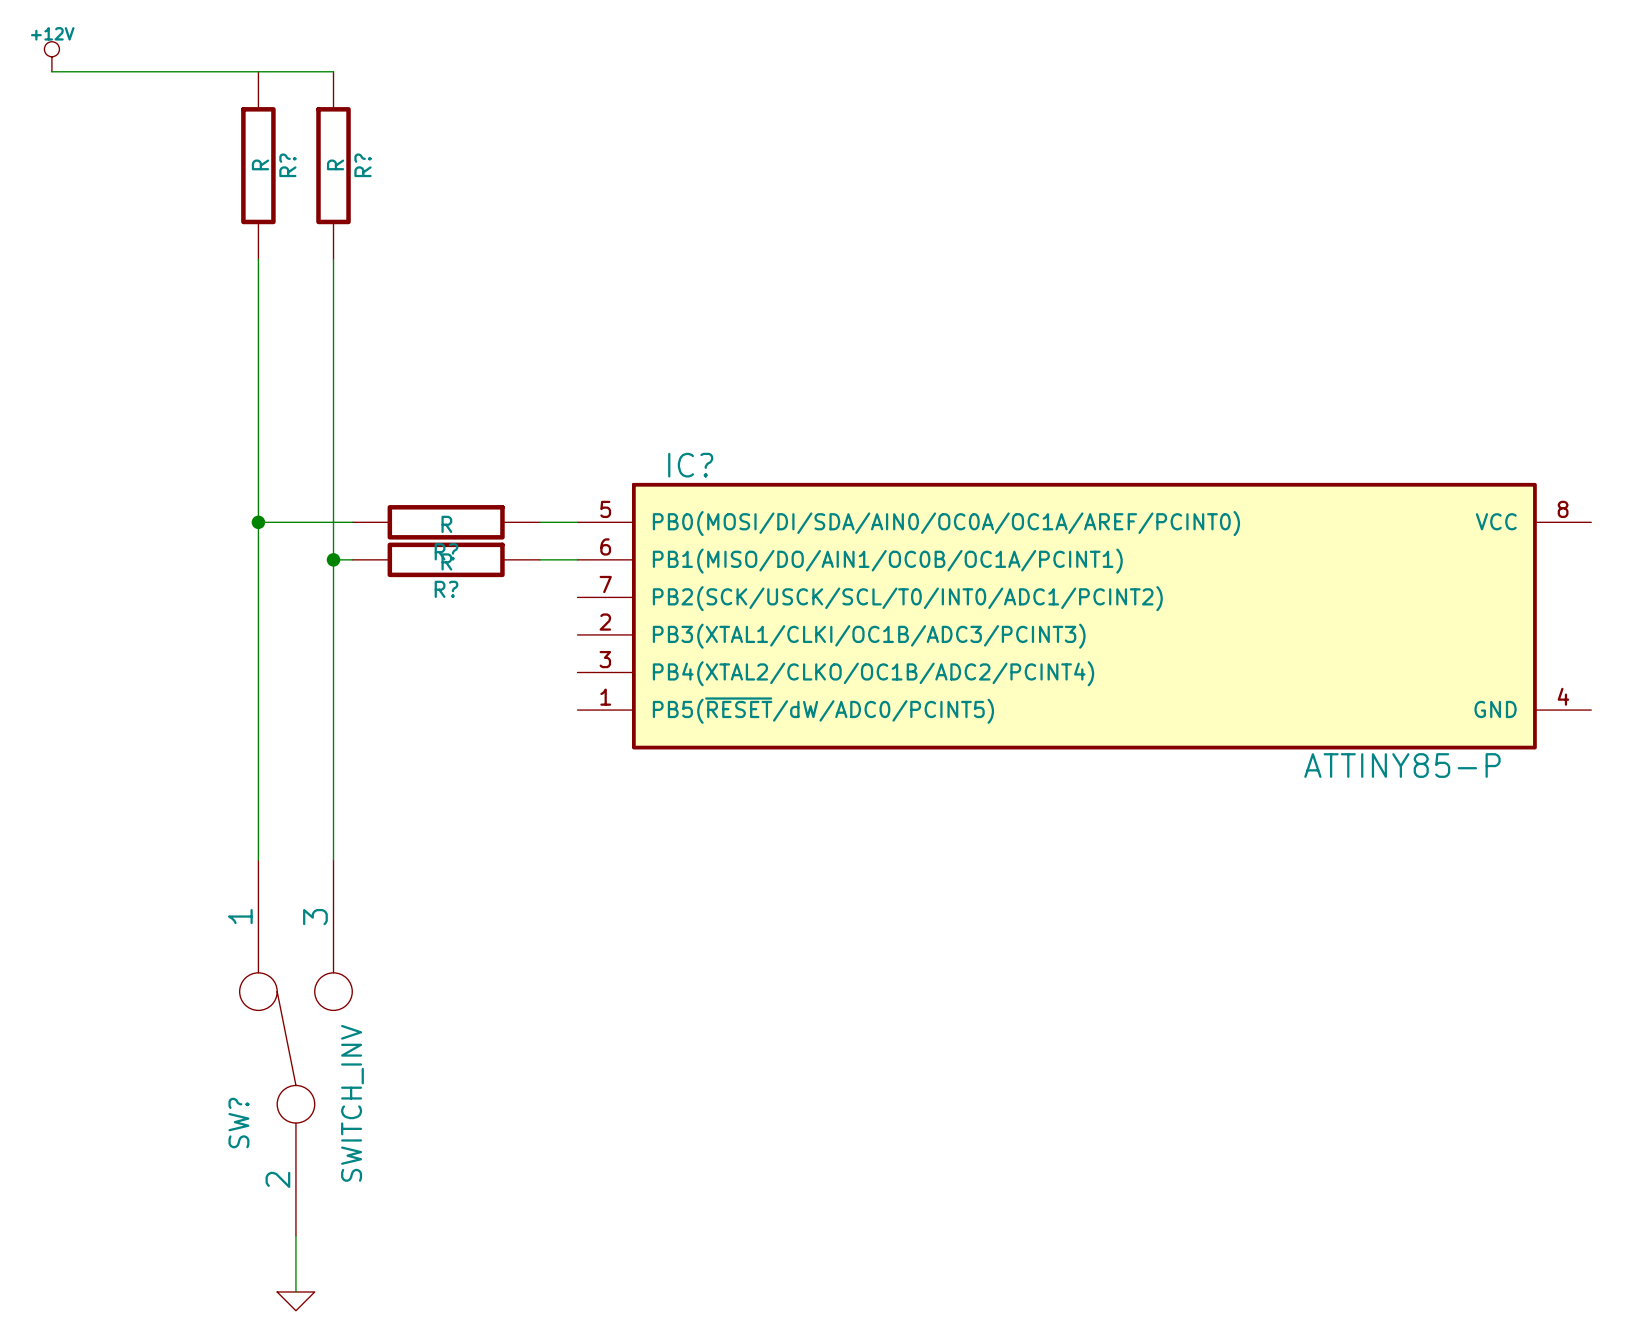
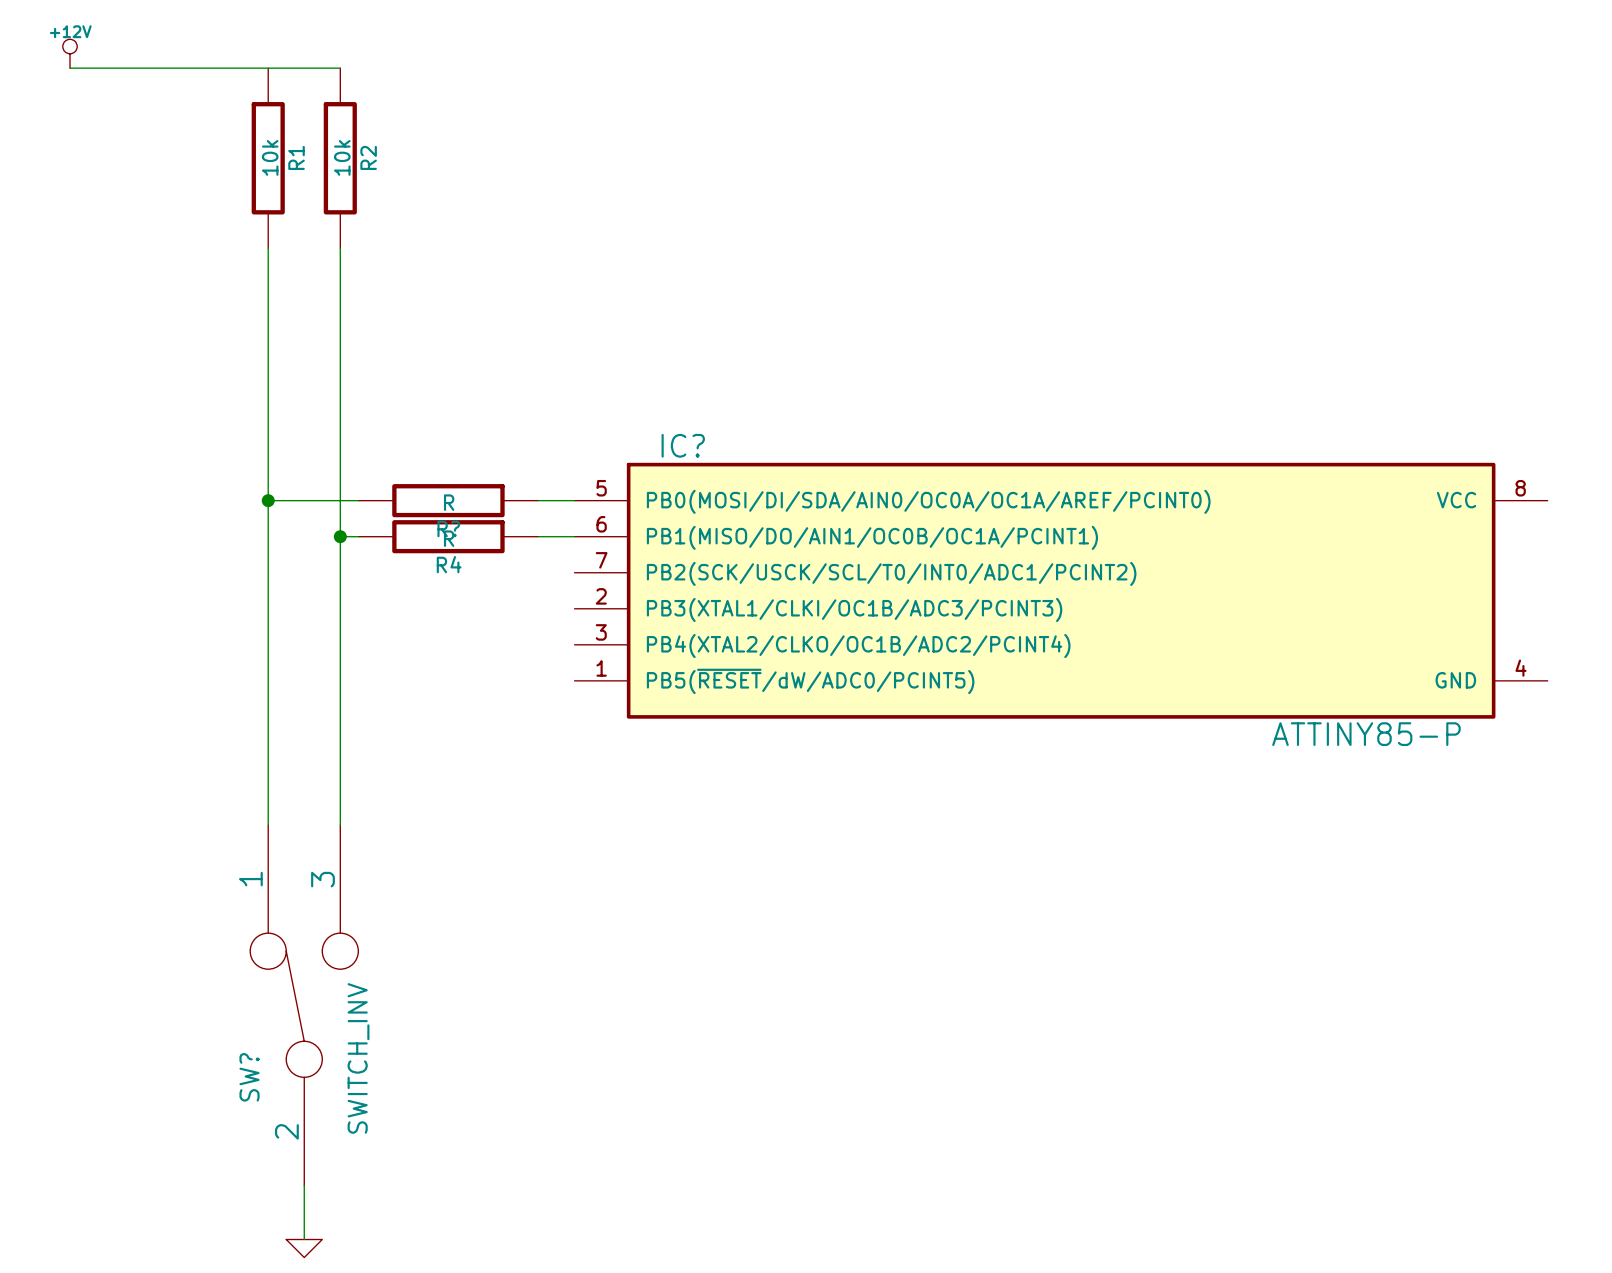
R? value: R (260, 164) -> 10k (270, 157)
R? value: R (335, 164) -> 10k (342, 157)
R? name: R? (287, 165) -> R1 (296, 157)
R? name: R? (362, 165) -> R2 (368, 157)
R? name: R? (446, 589) -> R4 (449, 564)

